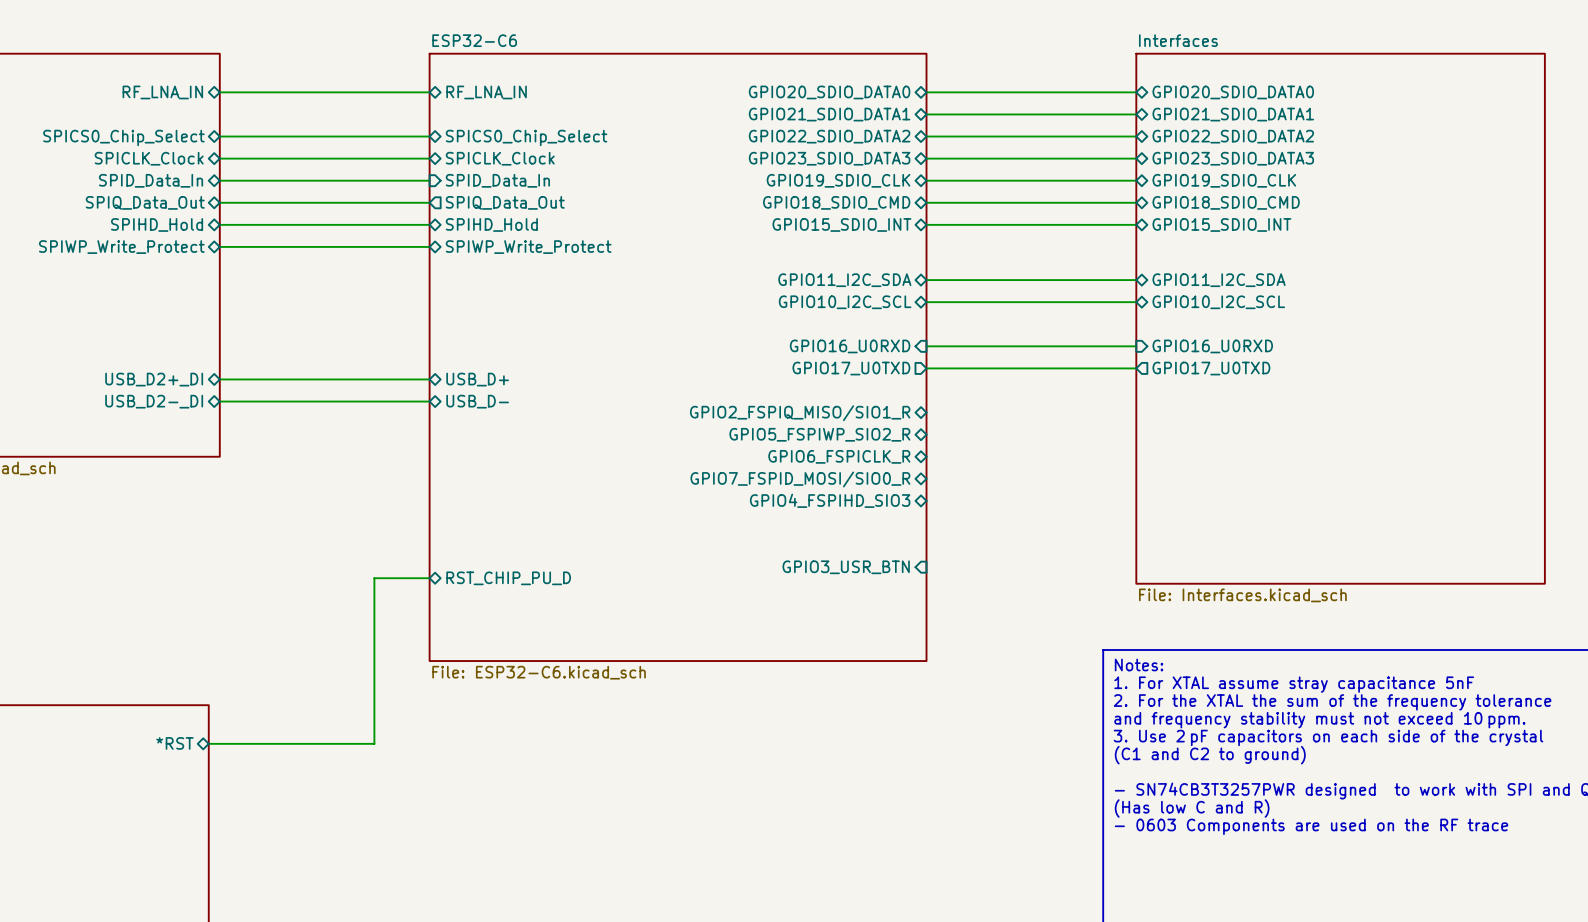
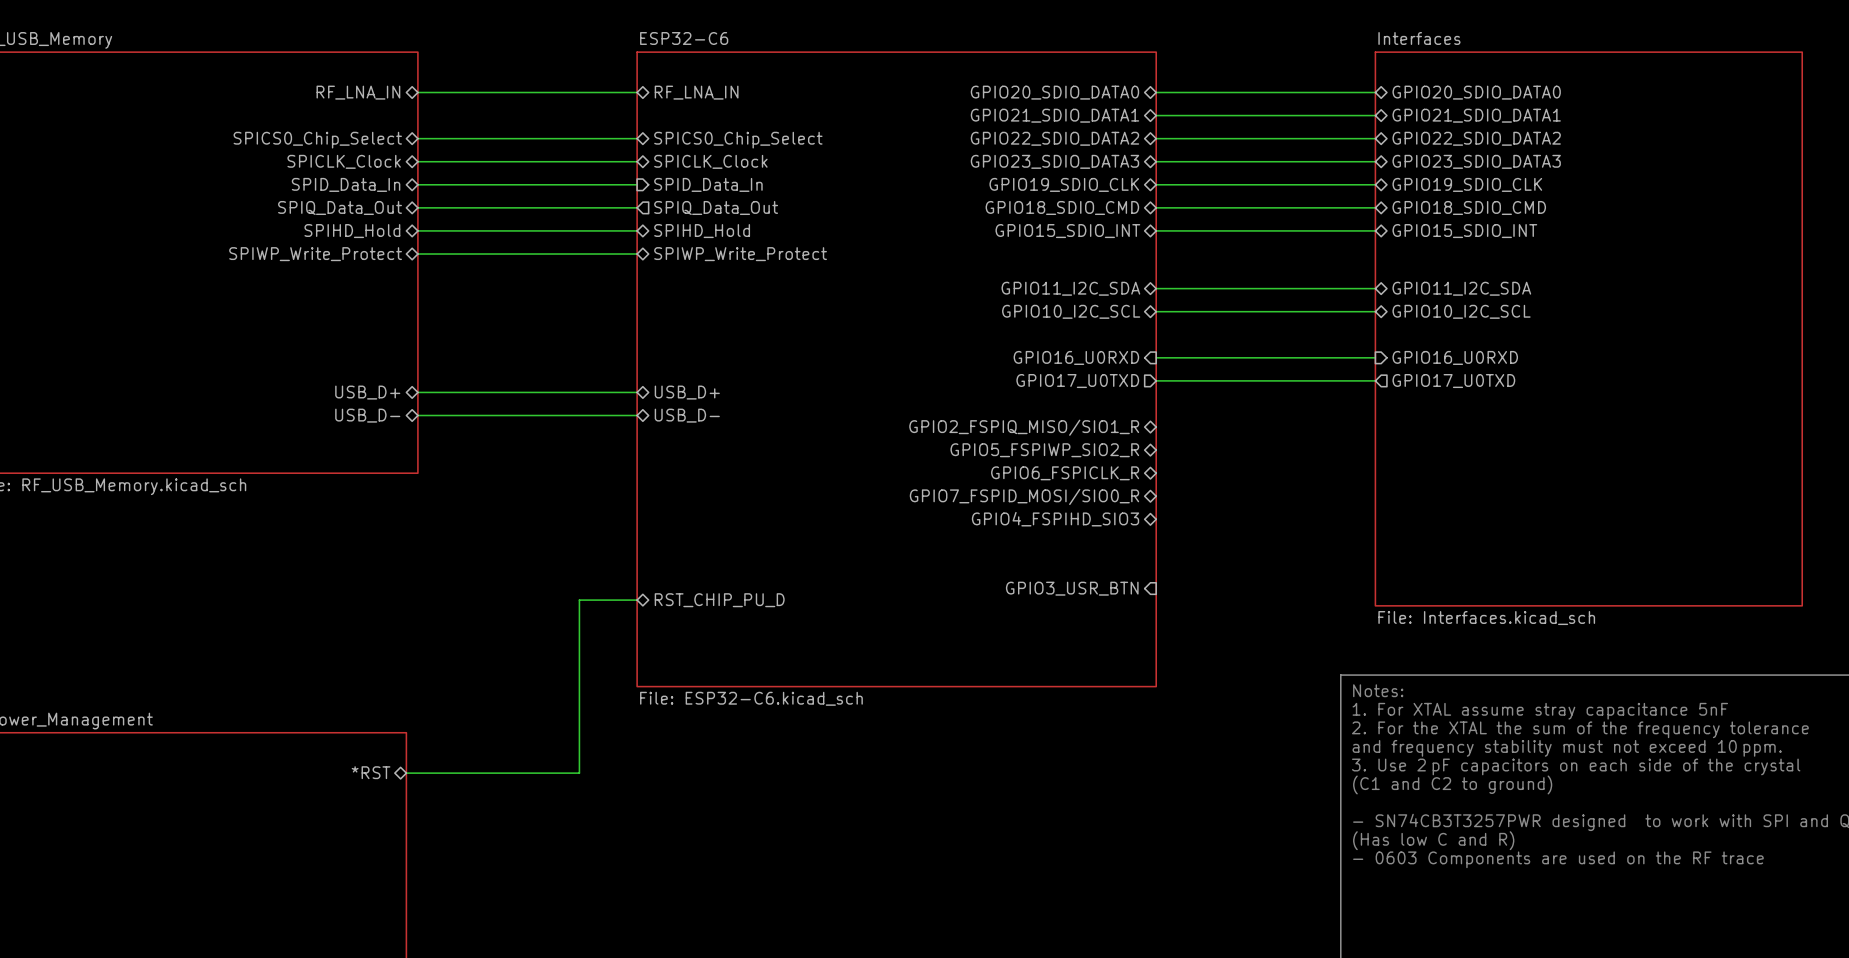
sheet pin: USB_D2+_DI (154, 379) -> USB_D+ (367, 392)
sheet pin: USB_D2-_DI (154, 401) -> USB_D- (367, 415)

